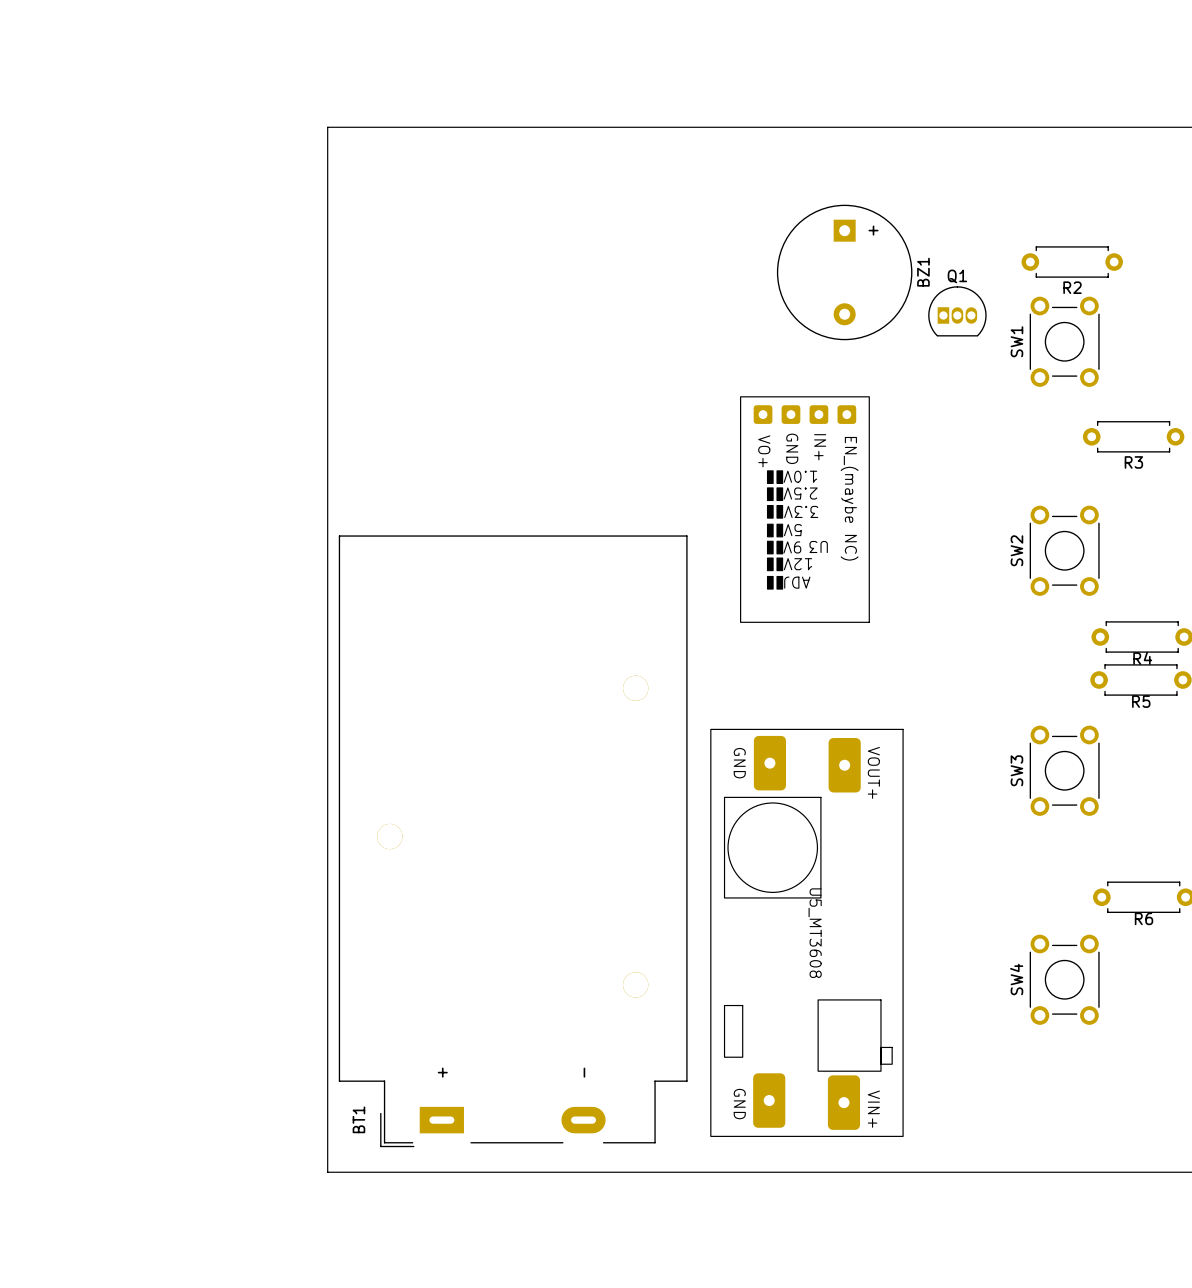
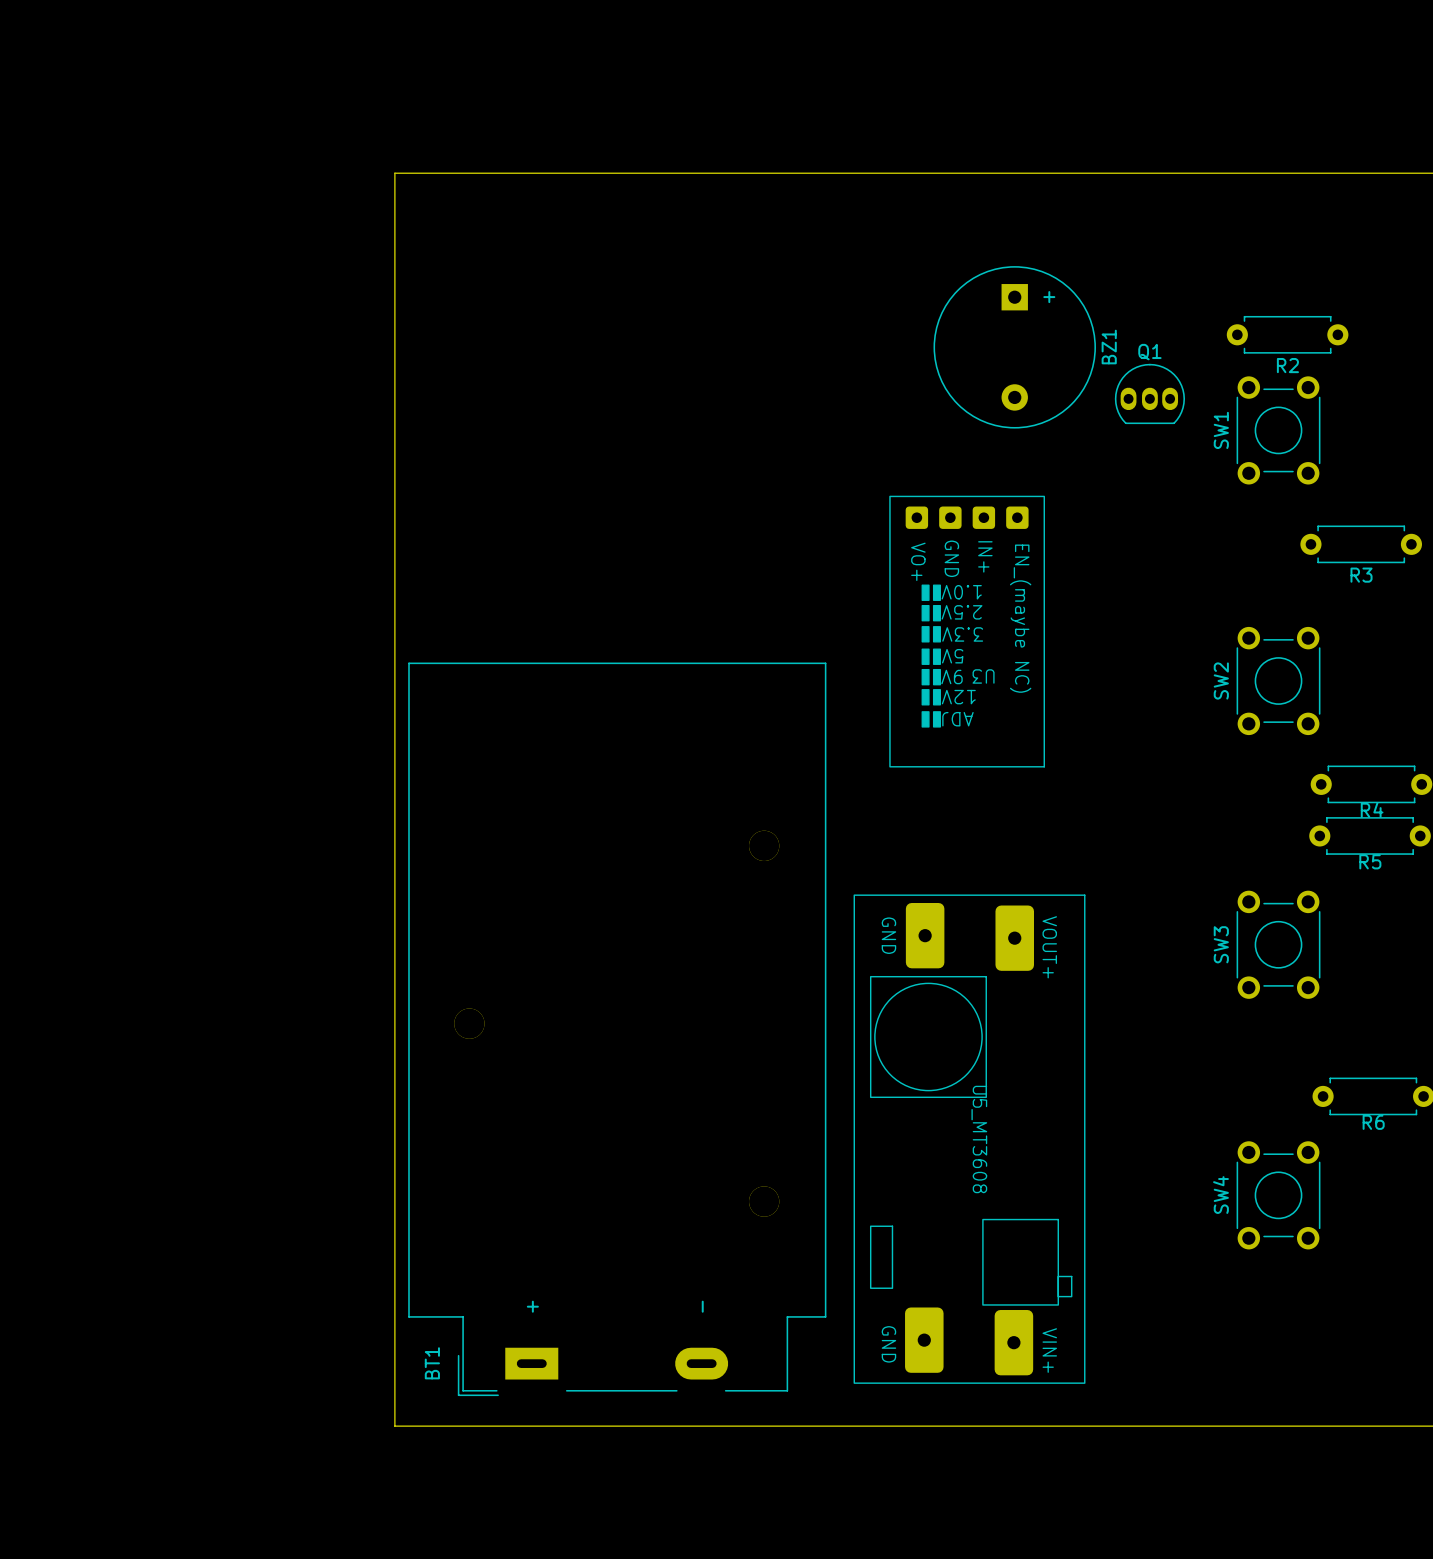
Q1 footprint: [928, 286, 987, 337] -> [1114, 363, 1186, 425]

